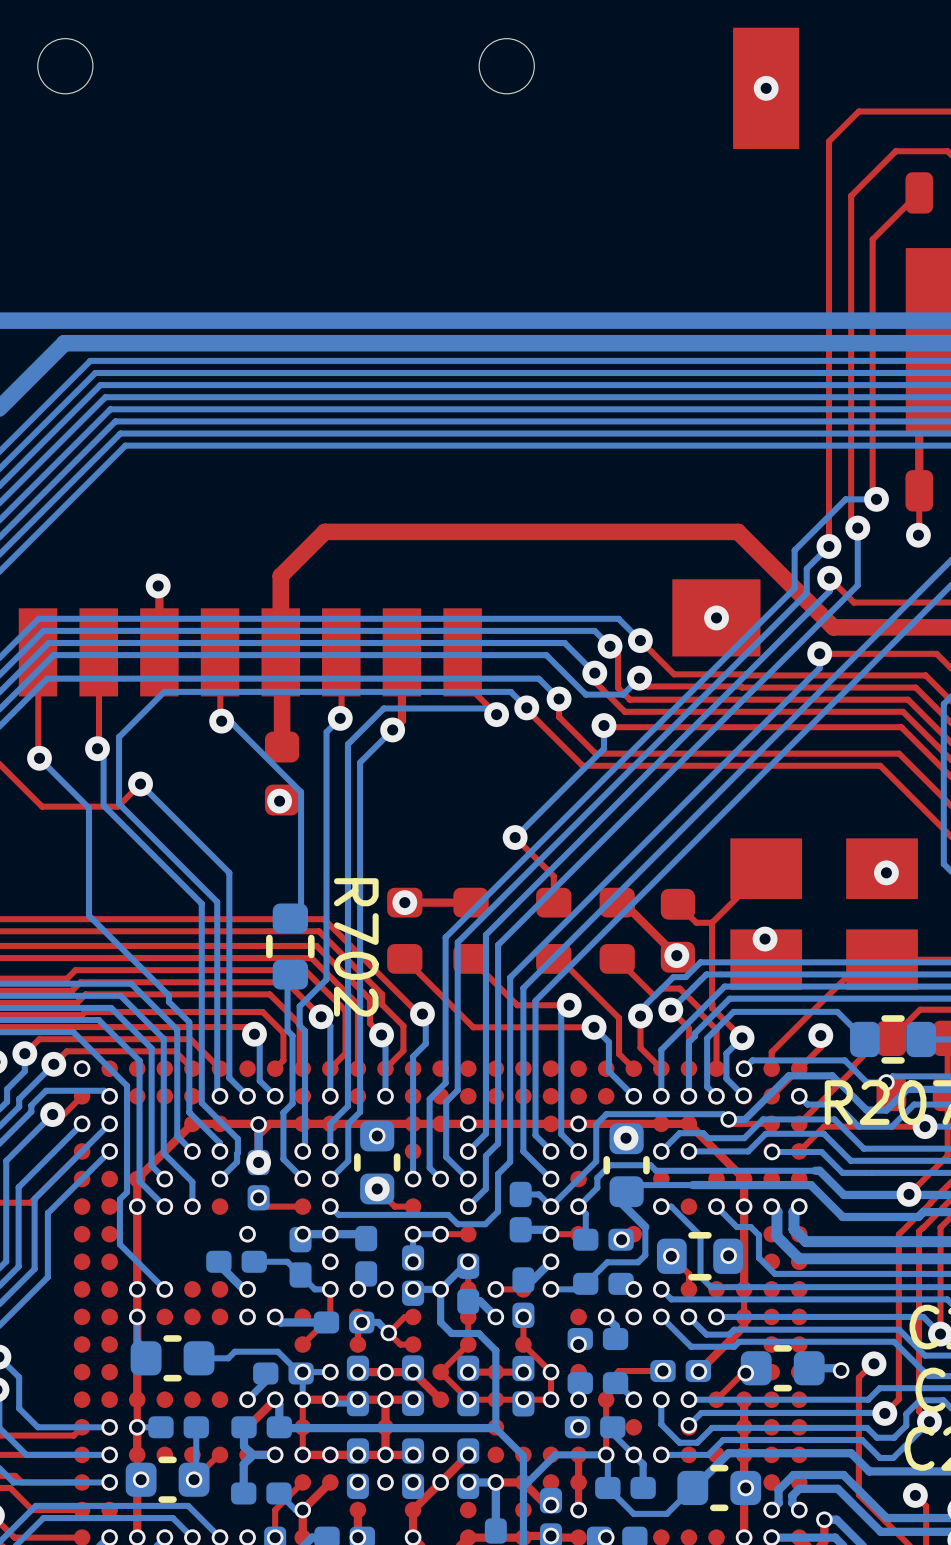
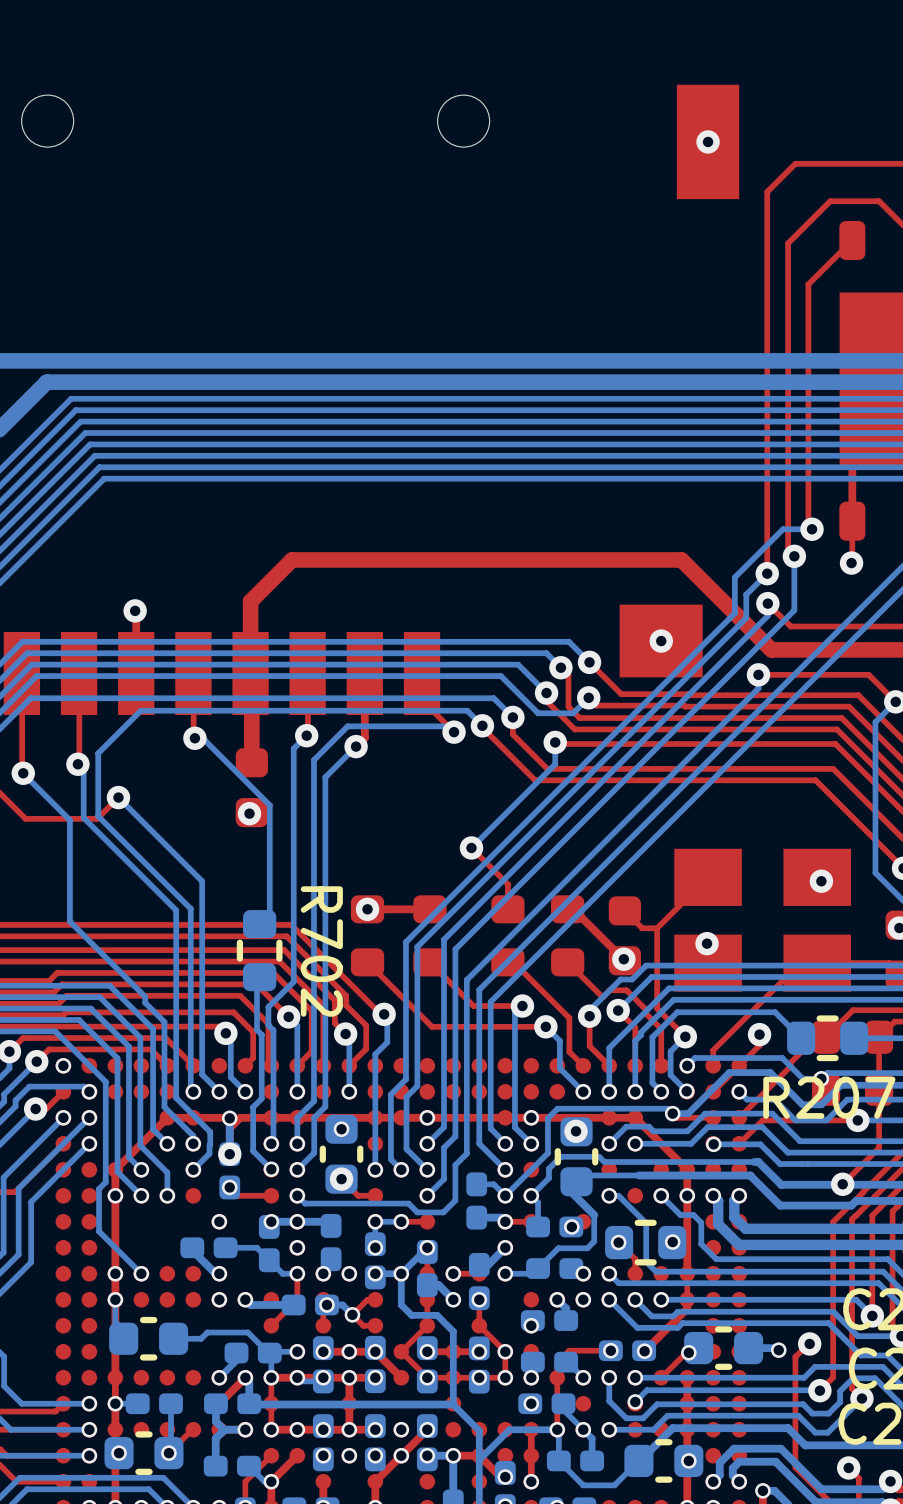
via: (302, 1372) -> none

